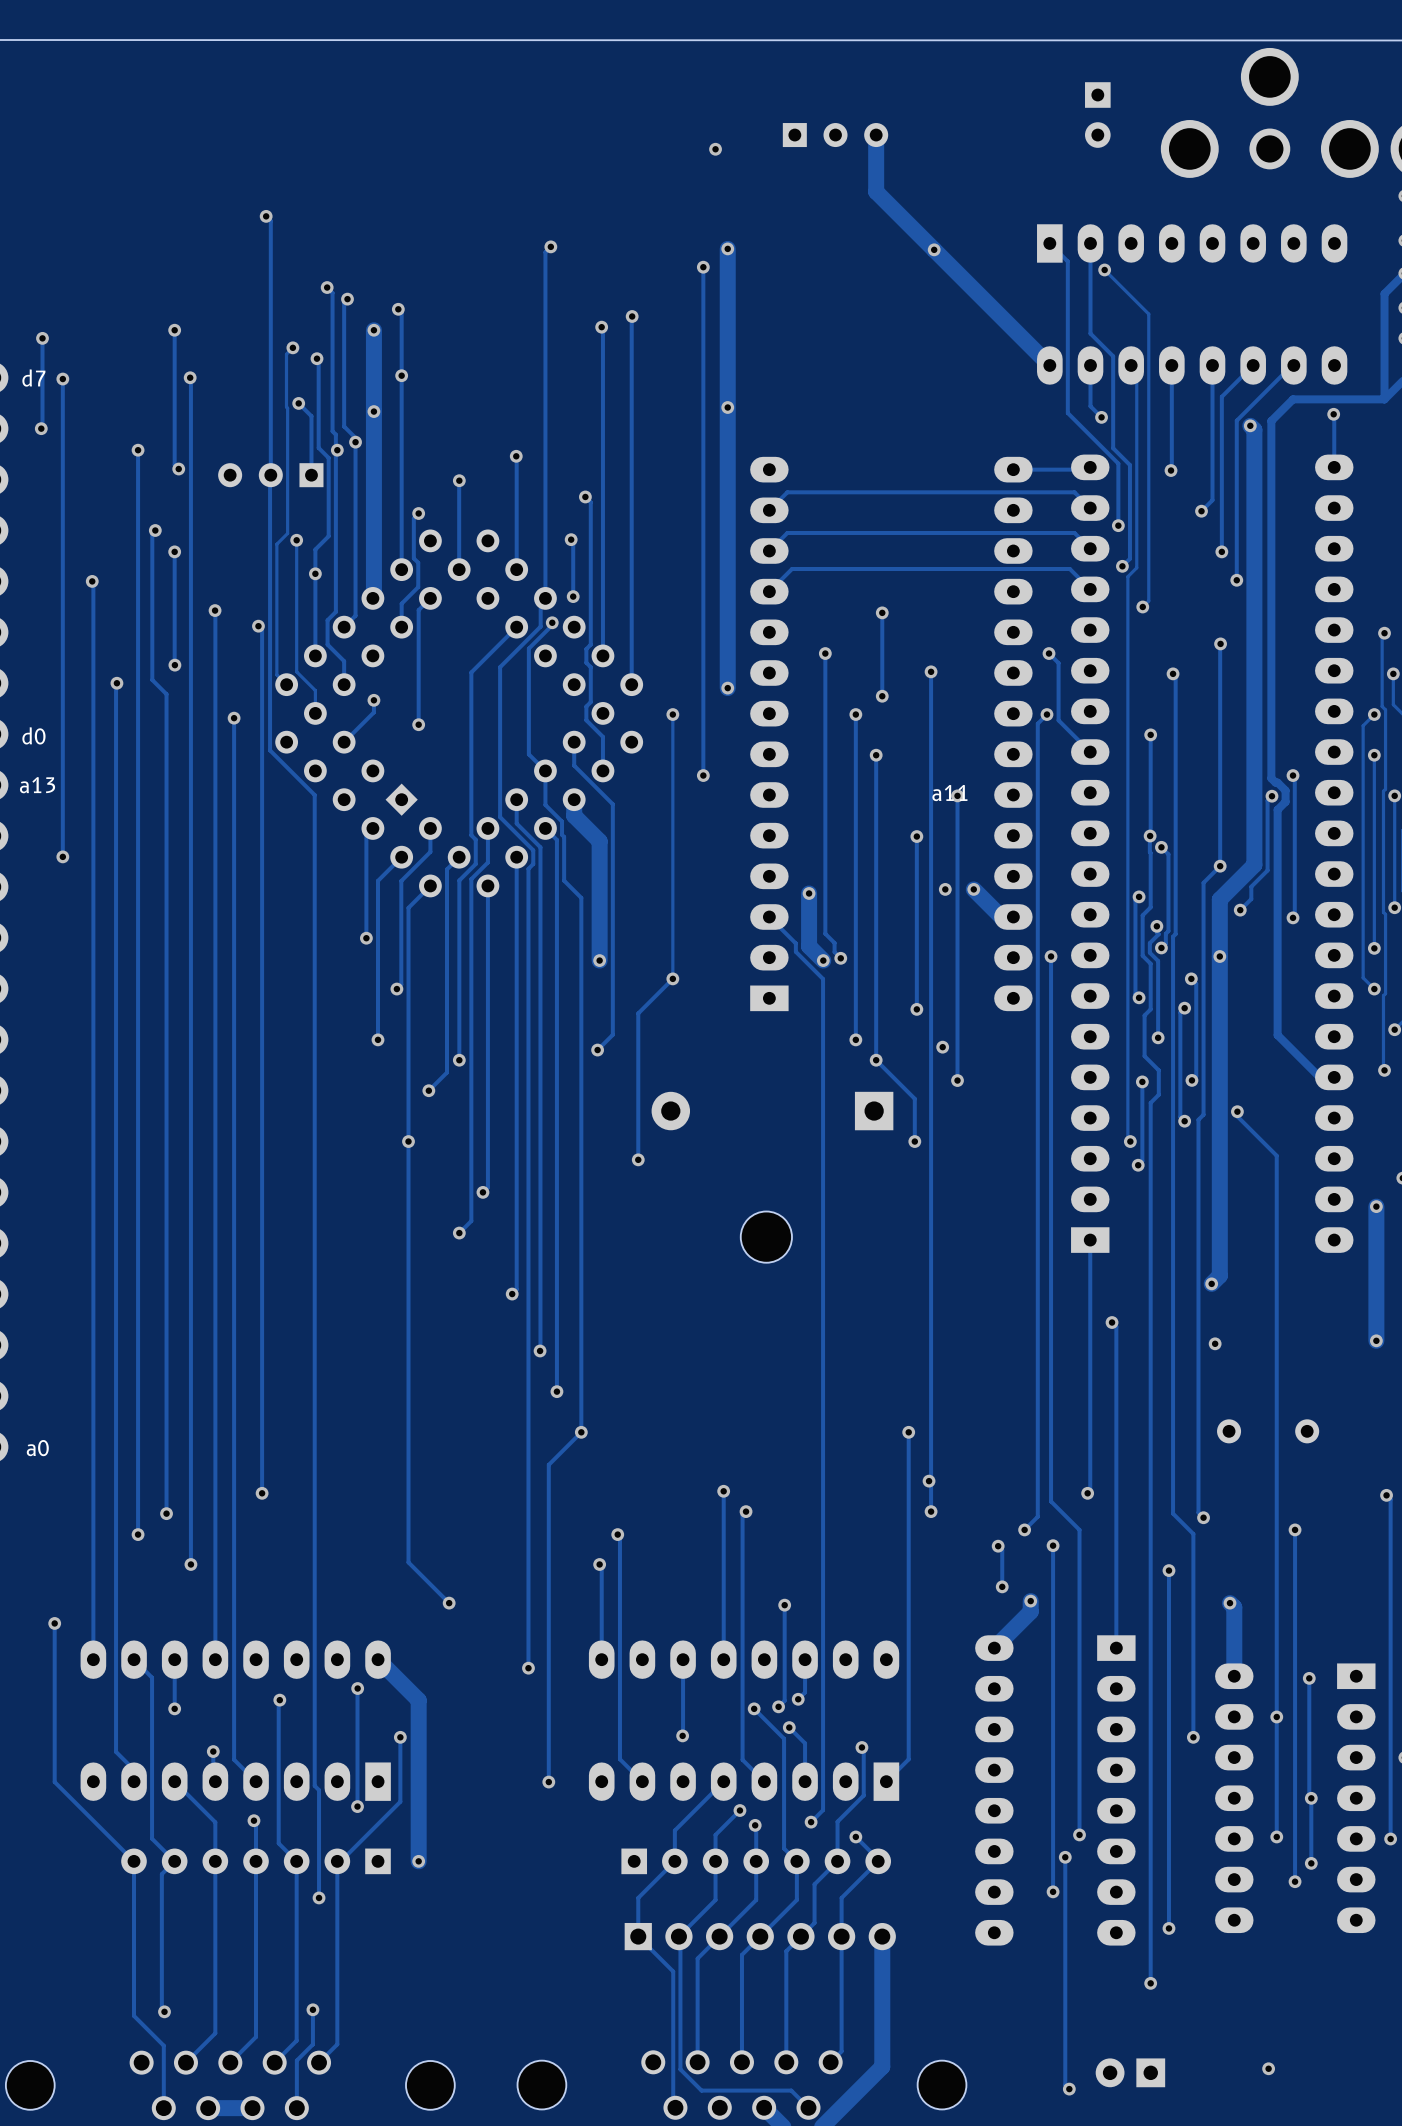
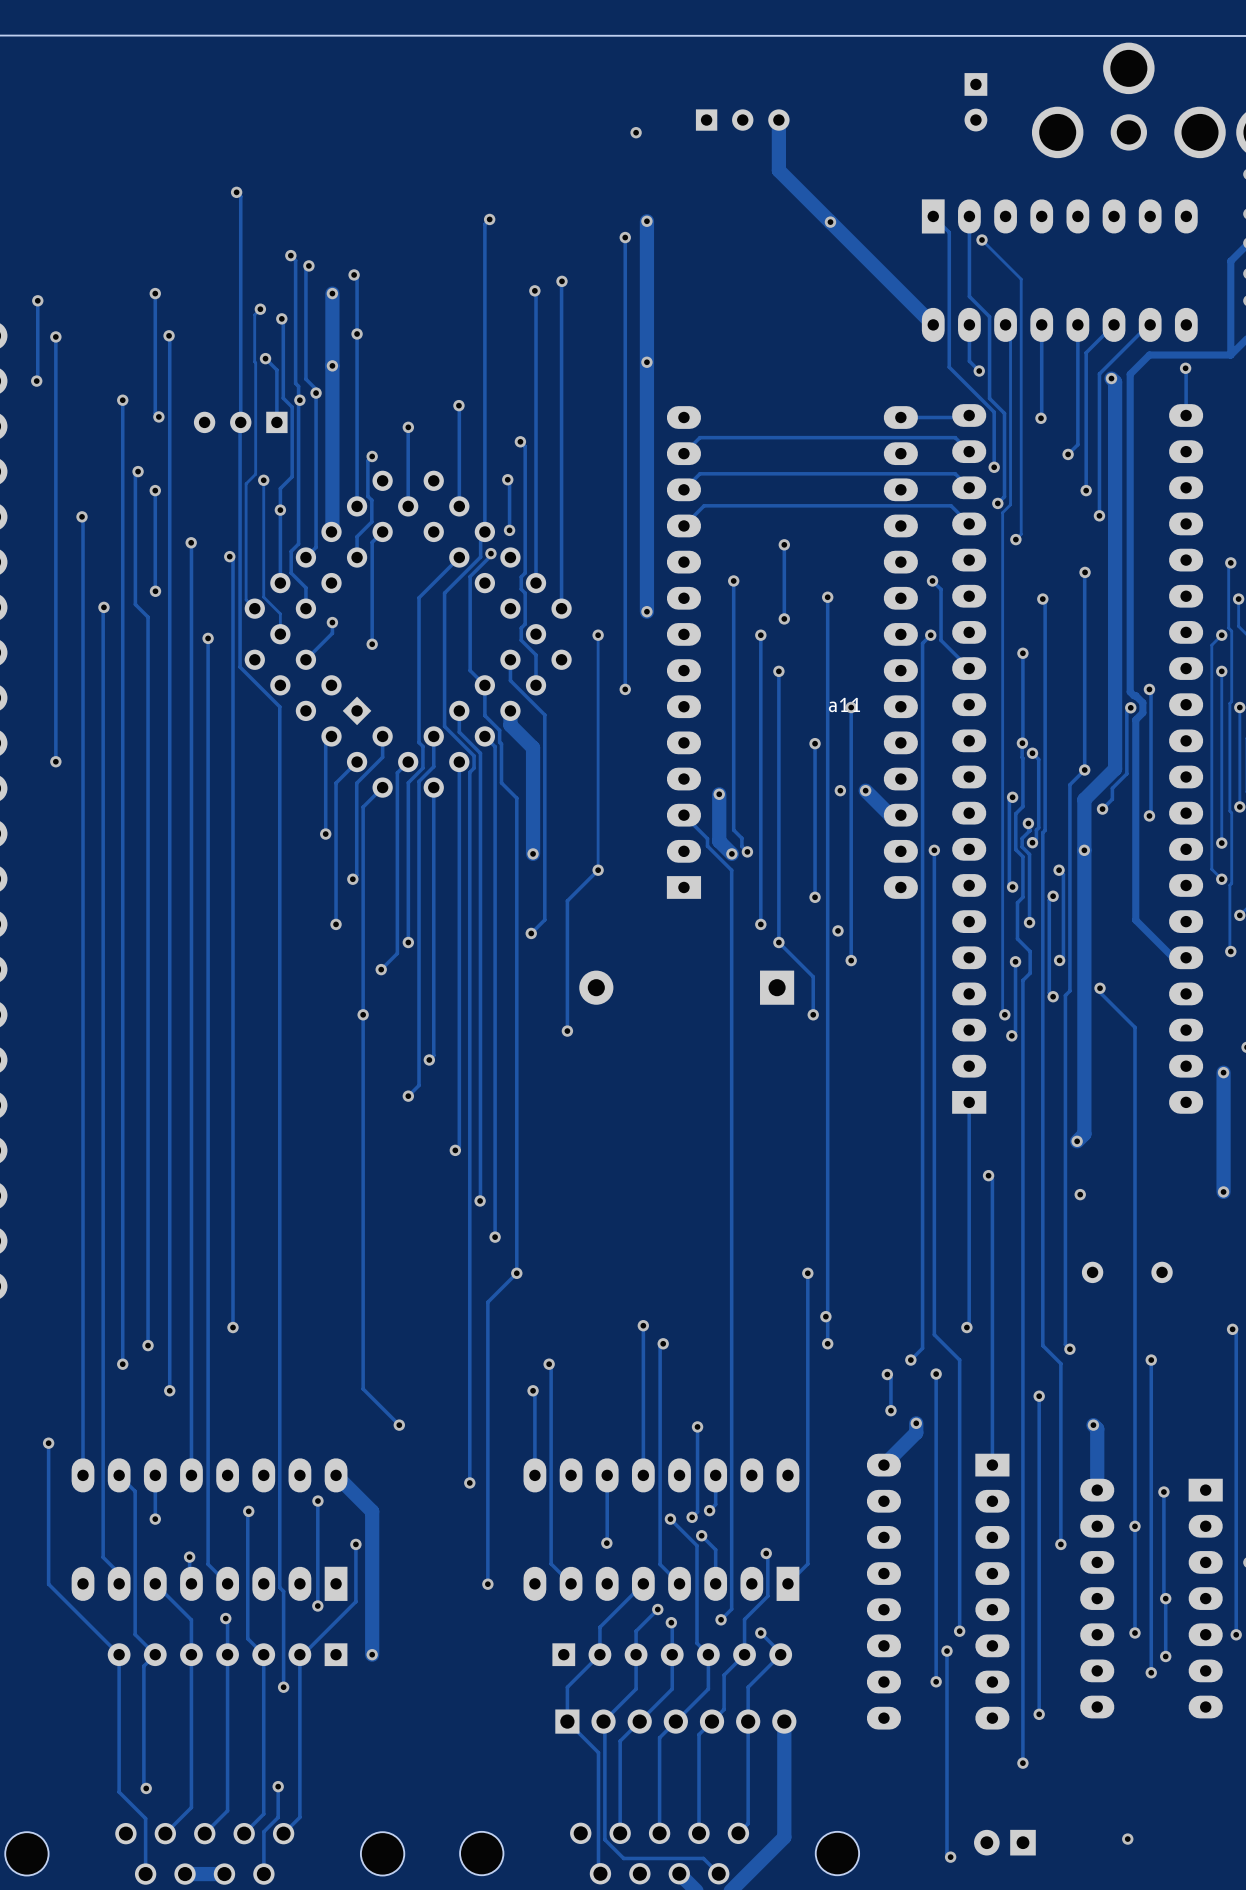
text: d7 (33, 378) -> none
text: d0 (33, 735) -> none
text: a13 (37, 785) -> none
part: (766, 1237) -> none
text: a0 (37, 1448) -> none

